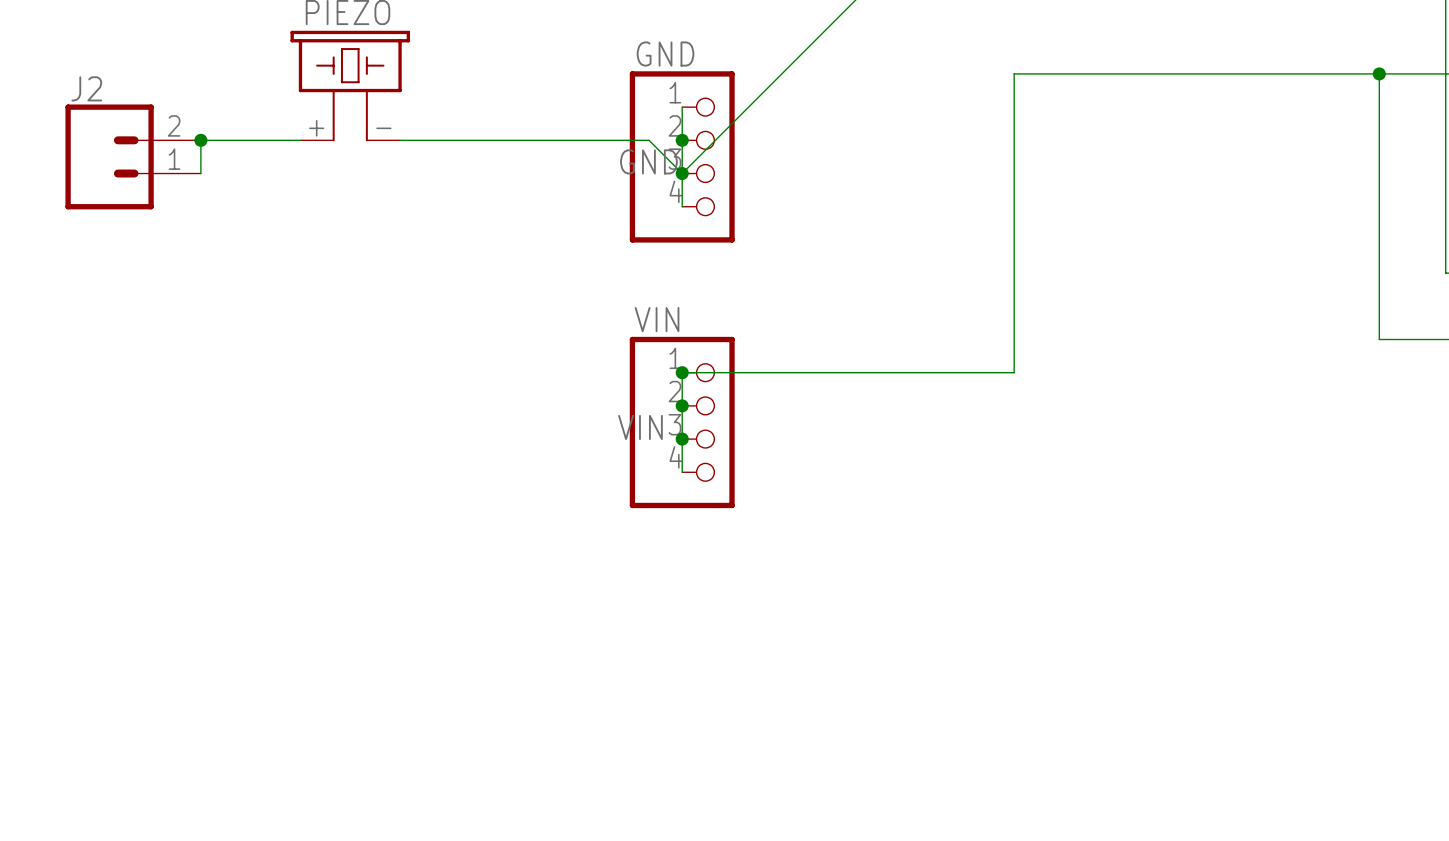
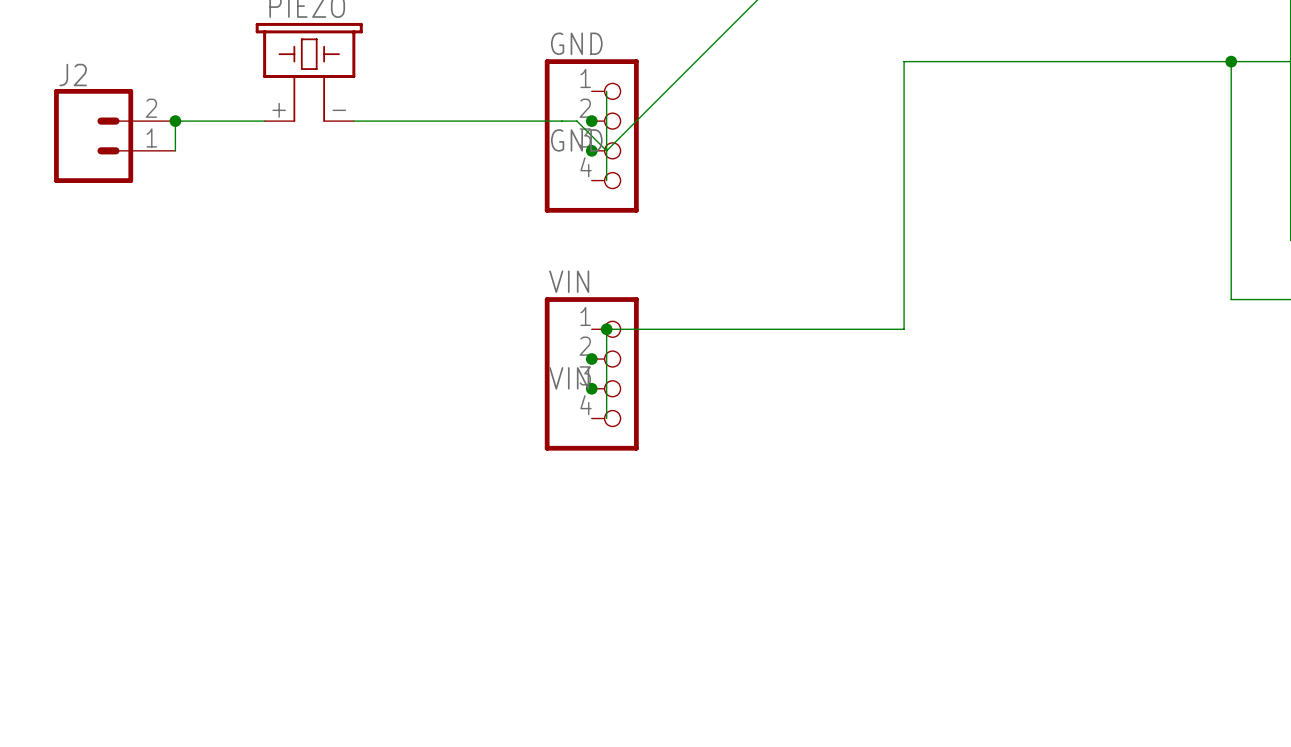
junction position: (682, 140) -> (591, 121)
GND position: (682, 156) -> (591, 135)
junction position: (682, 173) -> (591, 150)
junction position: (682, 405) -> (591, 359)
VIN position: (682, 422) -> (591, 373)
junction position: (682, 439) -> (591, 388)

